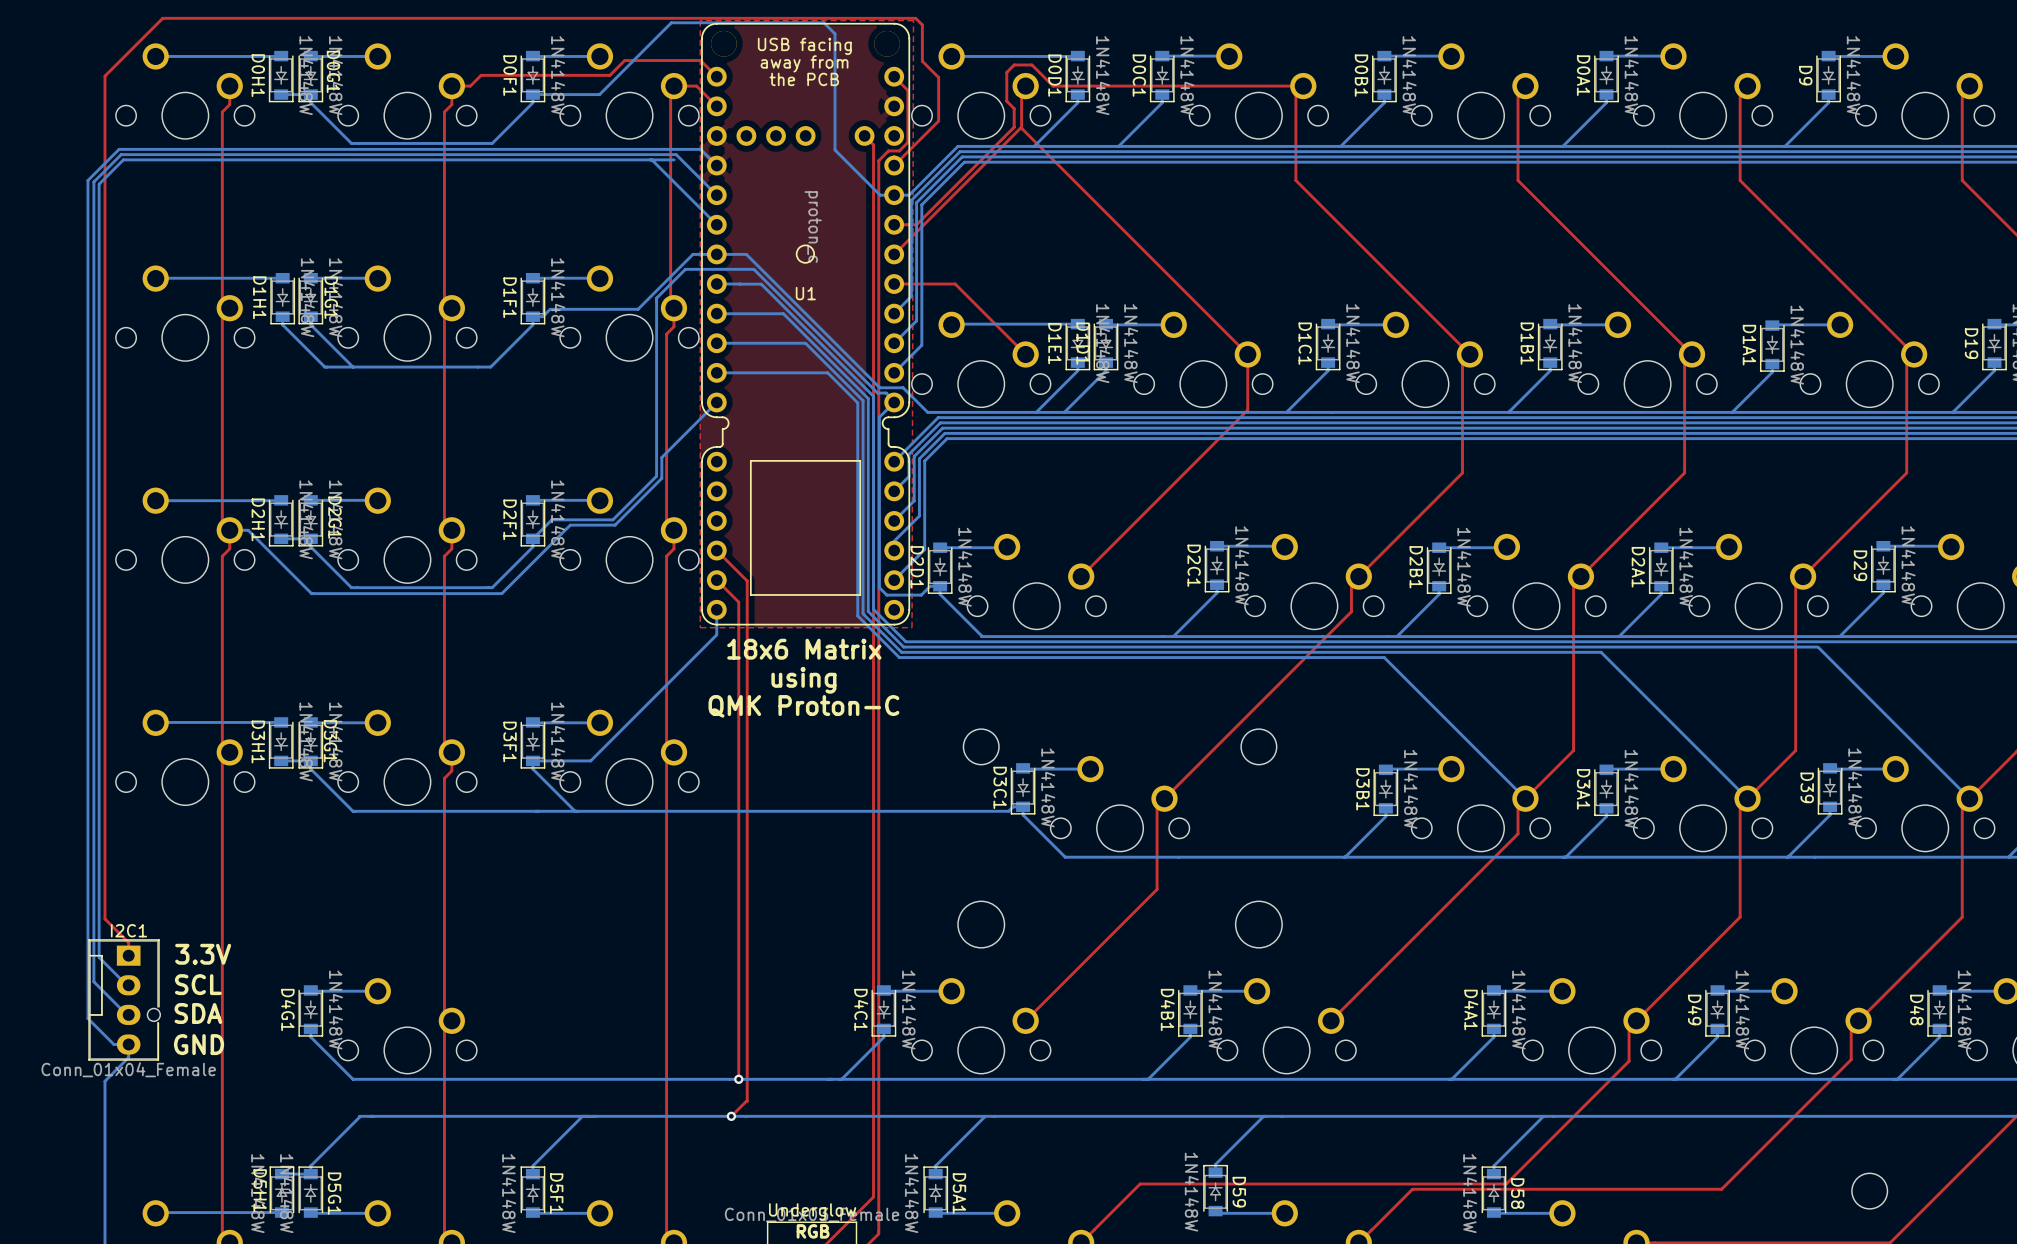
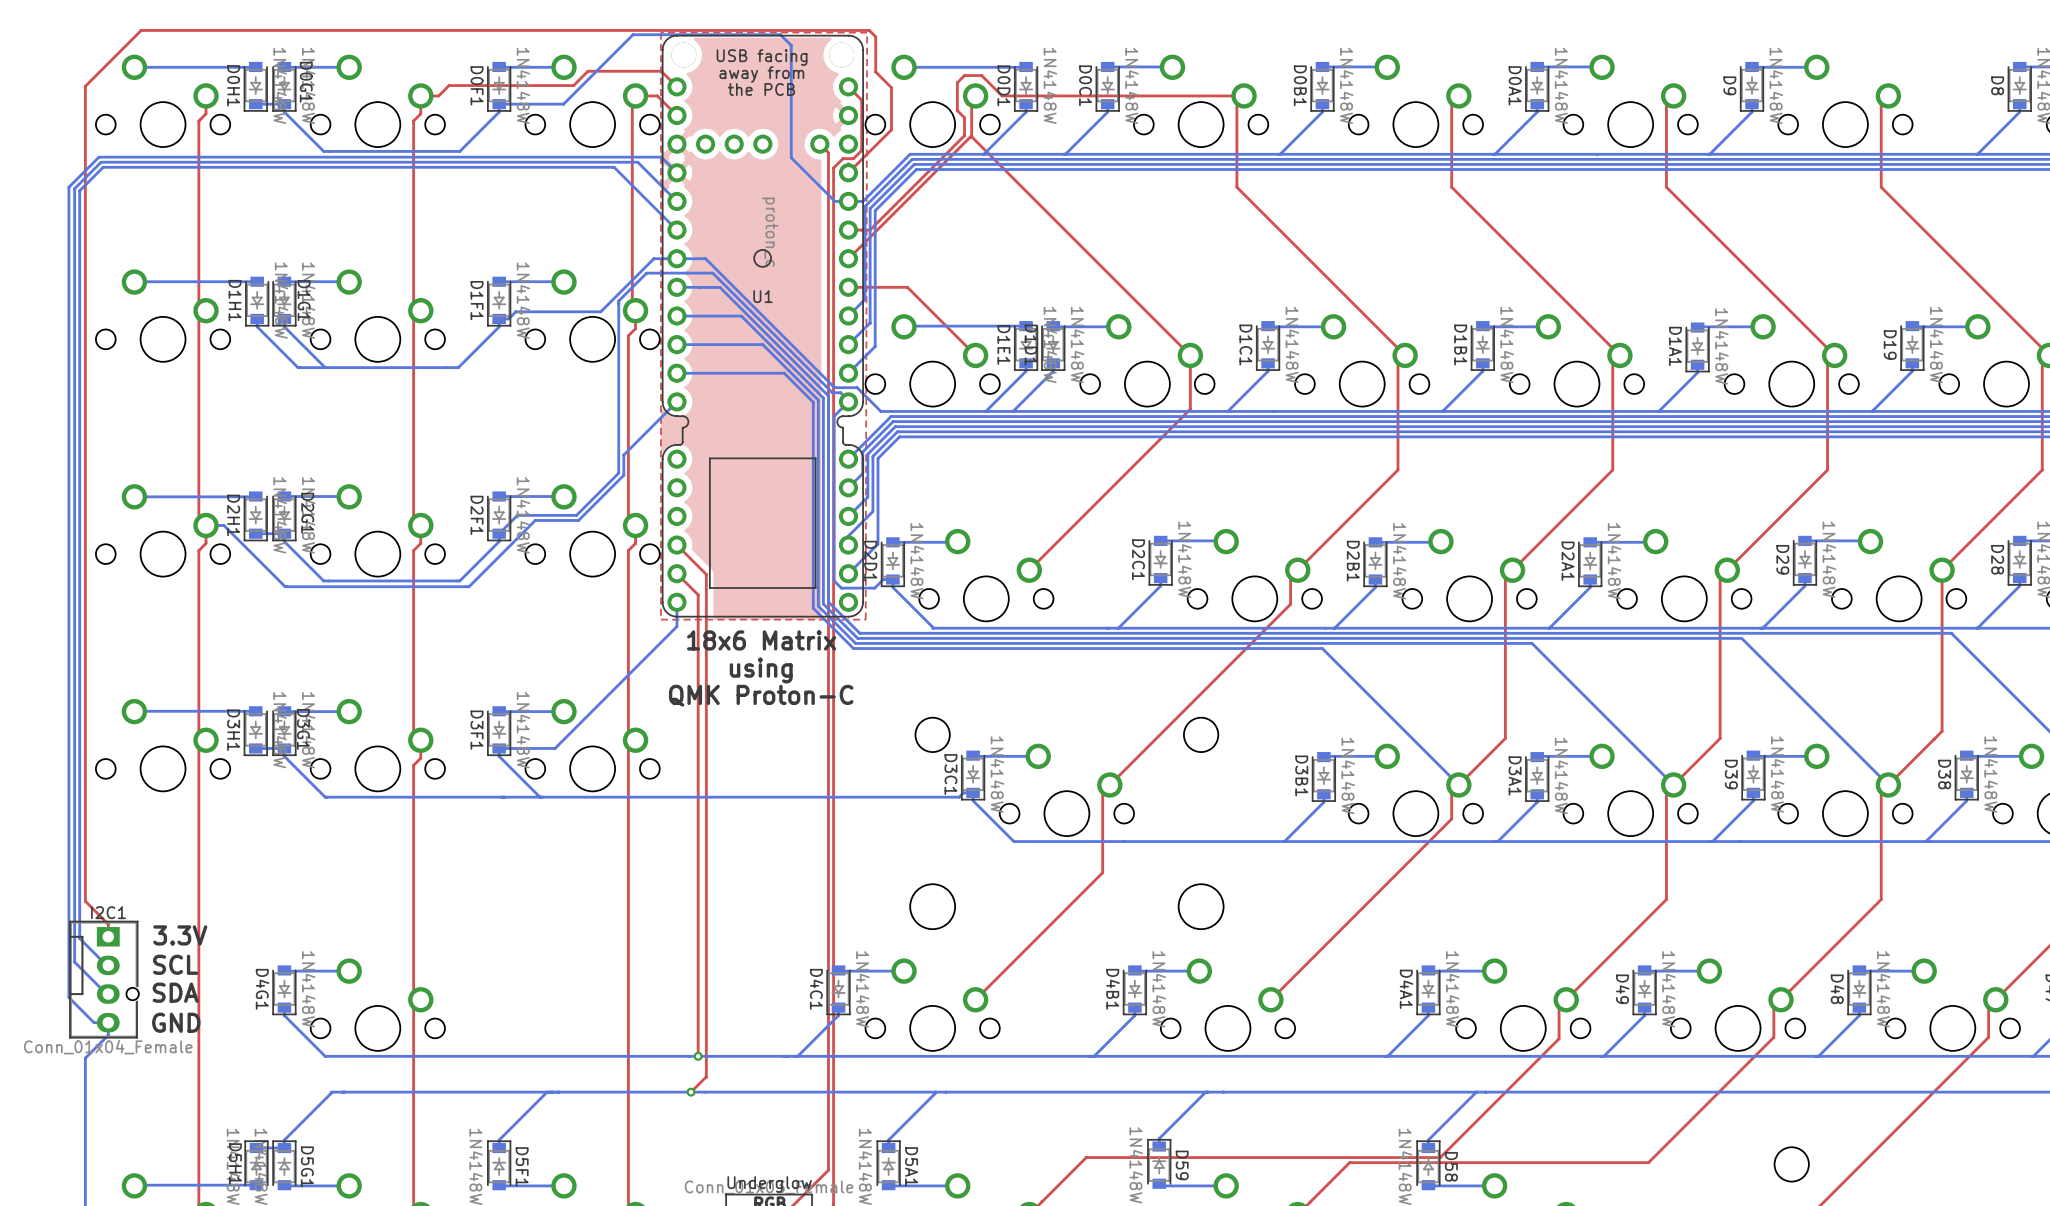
bottom track: (674, 159) (651, 159) -> none

